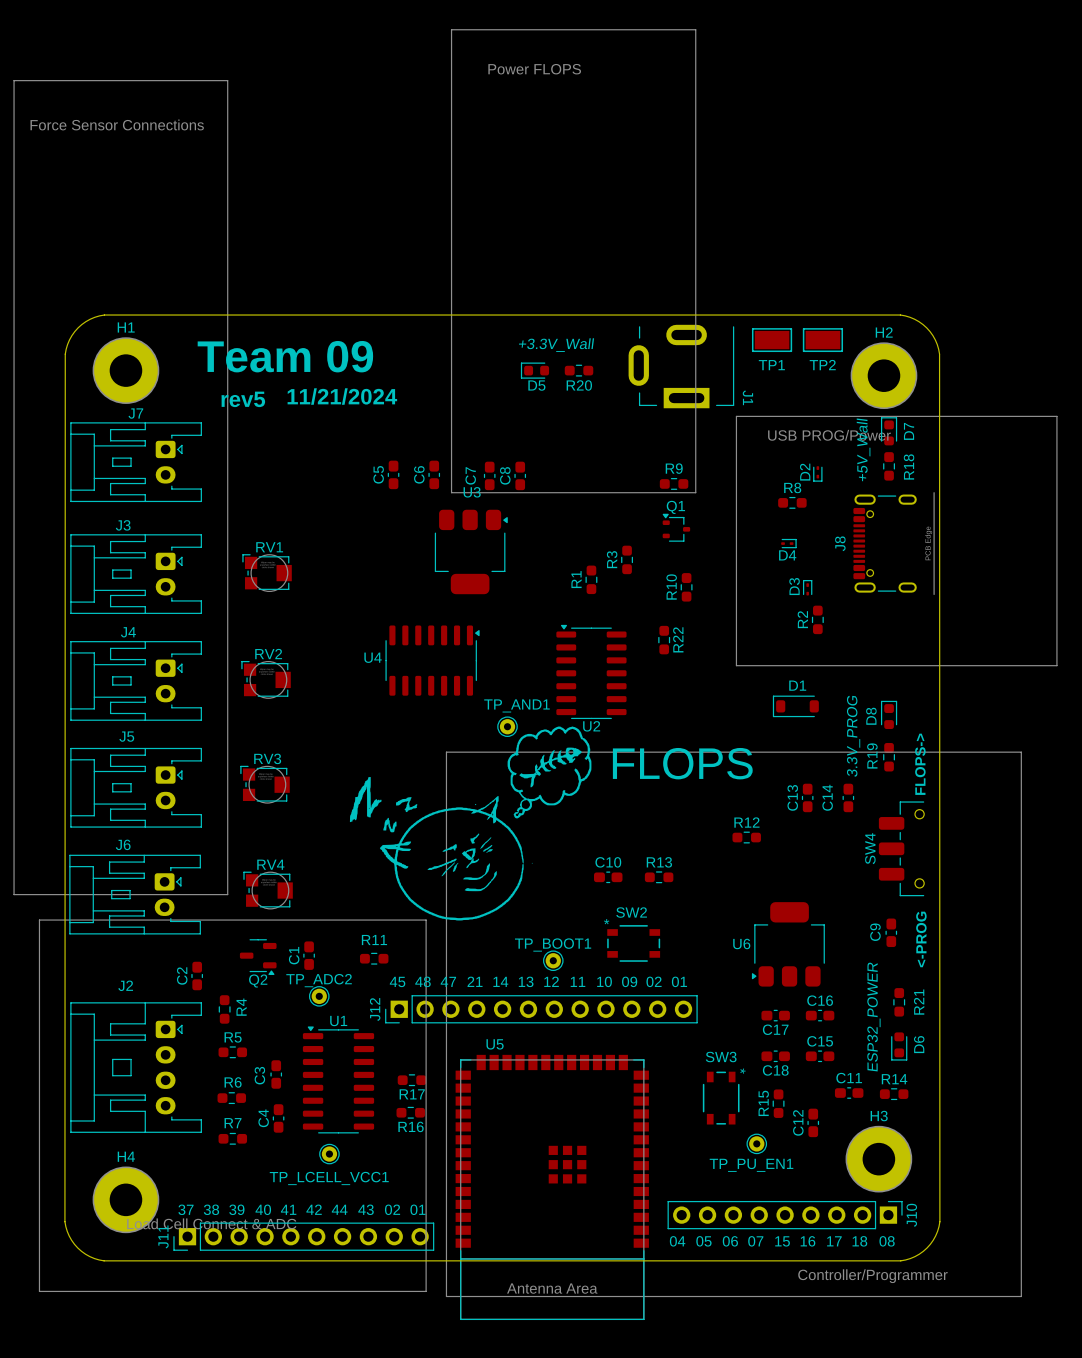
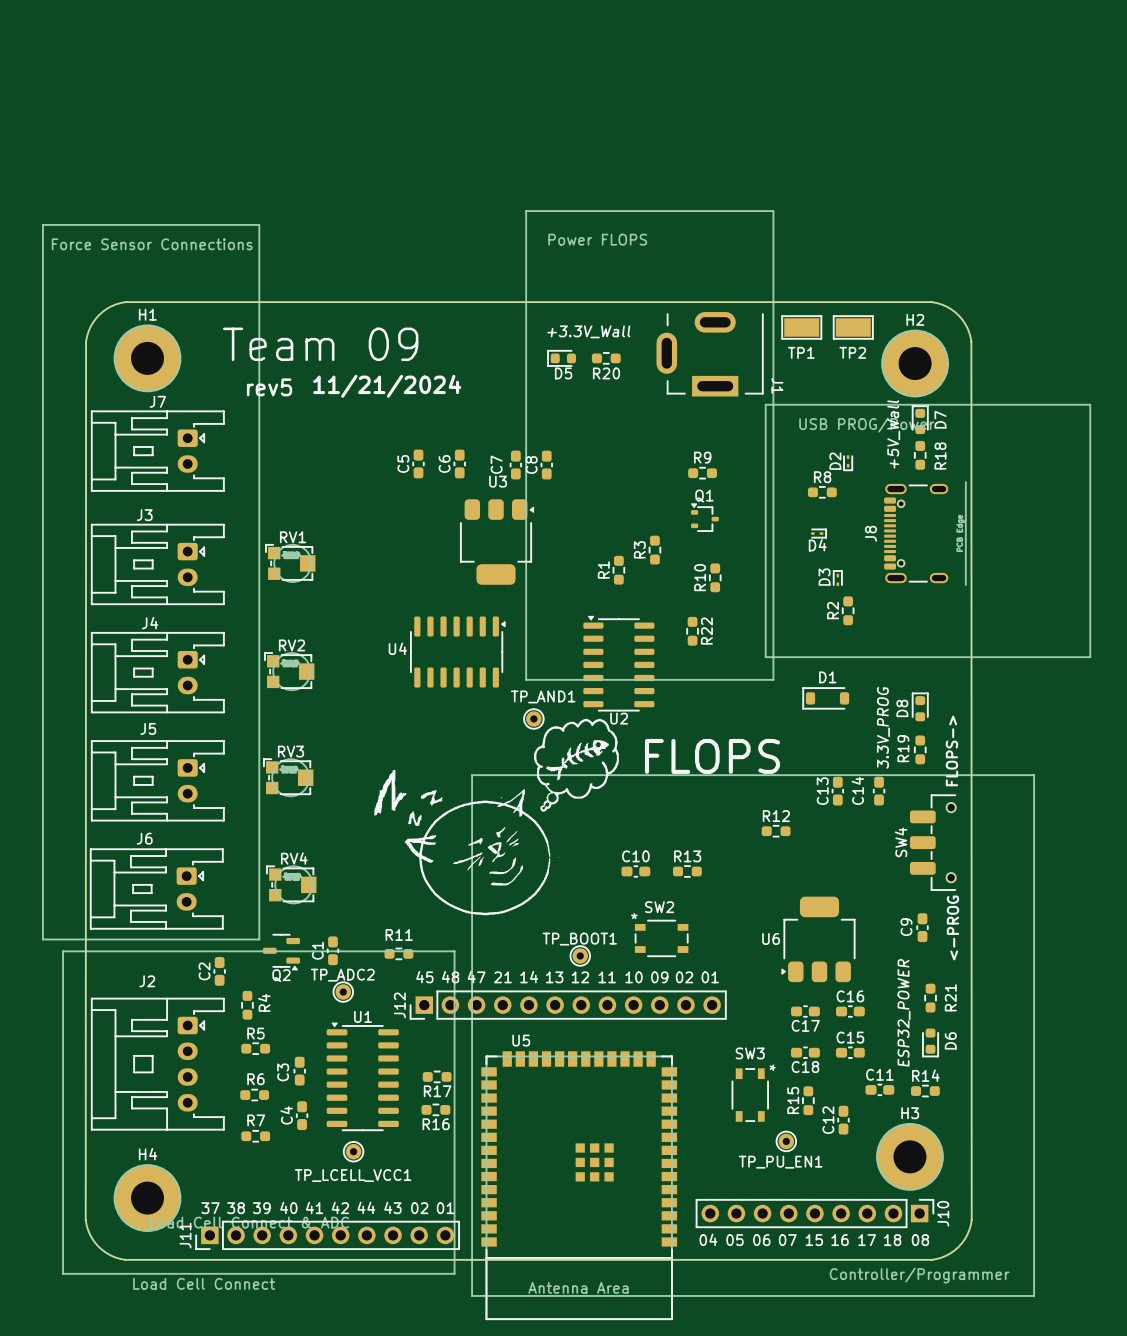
line: (451, 29) (695, 29) (695, 492) (451, 492) (451, 29) -> (526, 211) (773, 211) (773, 679) (526, 679) (526, 211)
text position: Power FLOPS (534, 69) -> Power FLOPS (597, 239)
line: (14, 80) (227, 80) (227, 894) (14, 894) (14, 80) -> (42, 224) (42, 939) (259, 939) (259, 224) (42, 224)
text position: Force Sensor Connections (117, 124) -> Force Sensor Connections (152, 244)
line: (446, 782) (446, 752) (1021, 752) (1021, 1296) (1001, 1296) -> (472, 775) (1034, 775) (1034, 1295)
line: (39, 920) (426, 920) (426, 1291) (39, 1291) (39, 920) -> (63, 951) (63, 1273) (454, 1273) (454, 951) (63, 951)
text: none -> Load Cell Connect (204, 1283)

